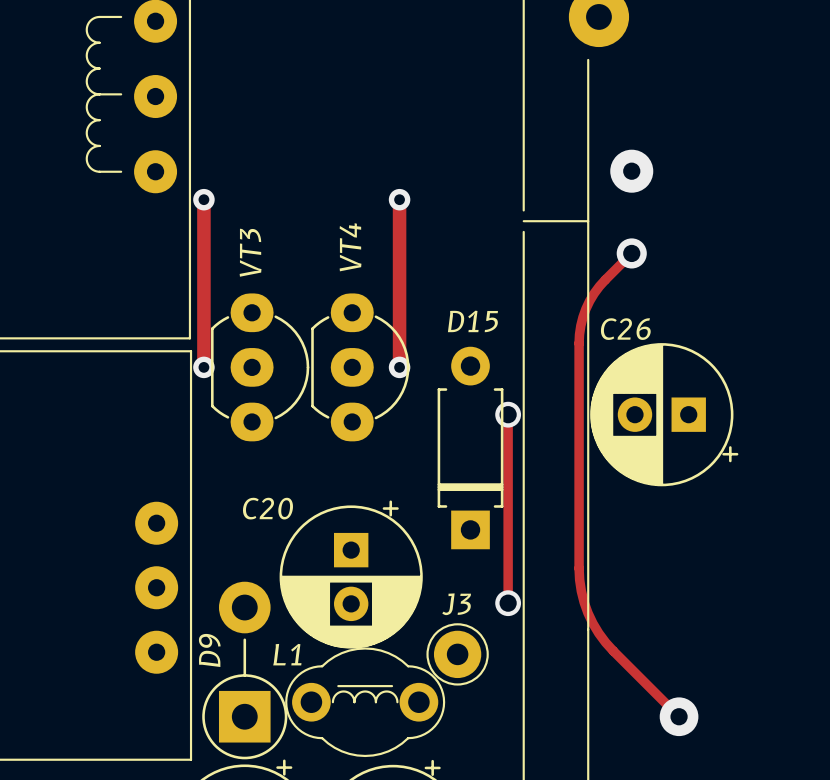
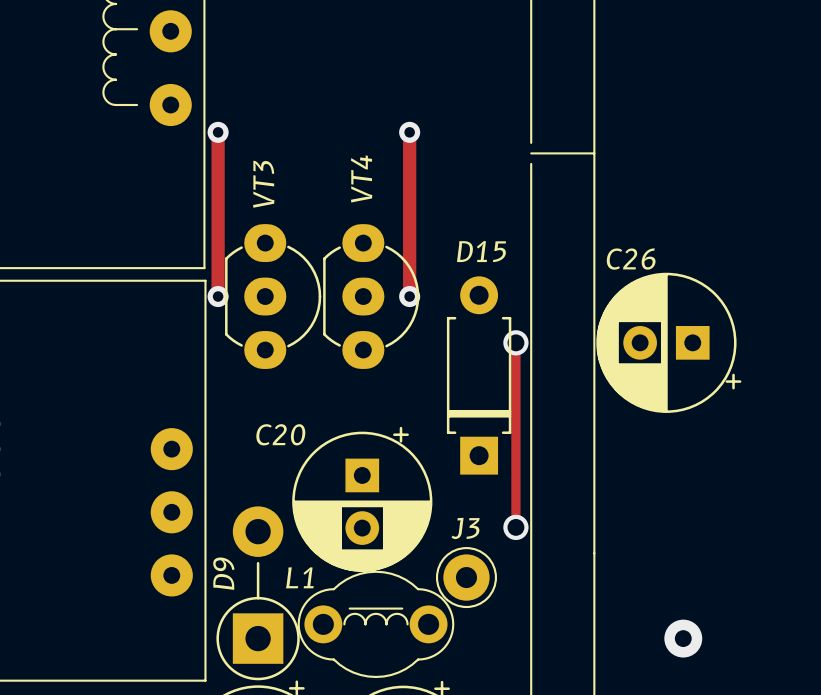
via: (631, 171) -> none
track: (631, 253) (594, 293) (585, 308) (580, 325) (579, 343) (579, 579) (584, 602) (598, 633) (613, 651) (679, 716) -> none
via: (631, 253) -> none

